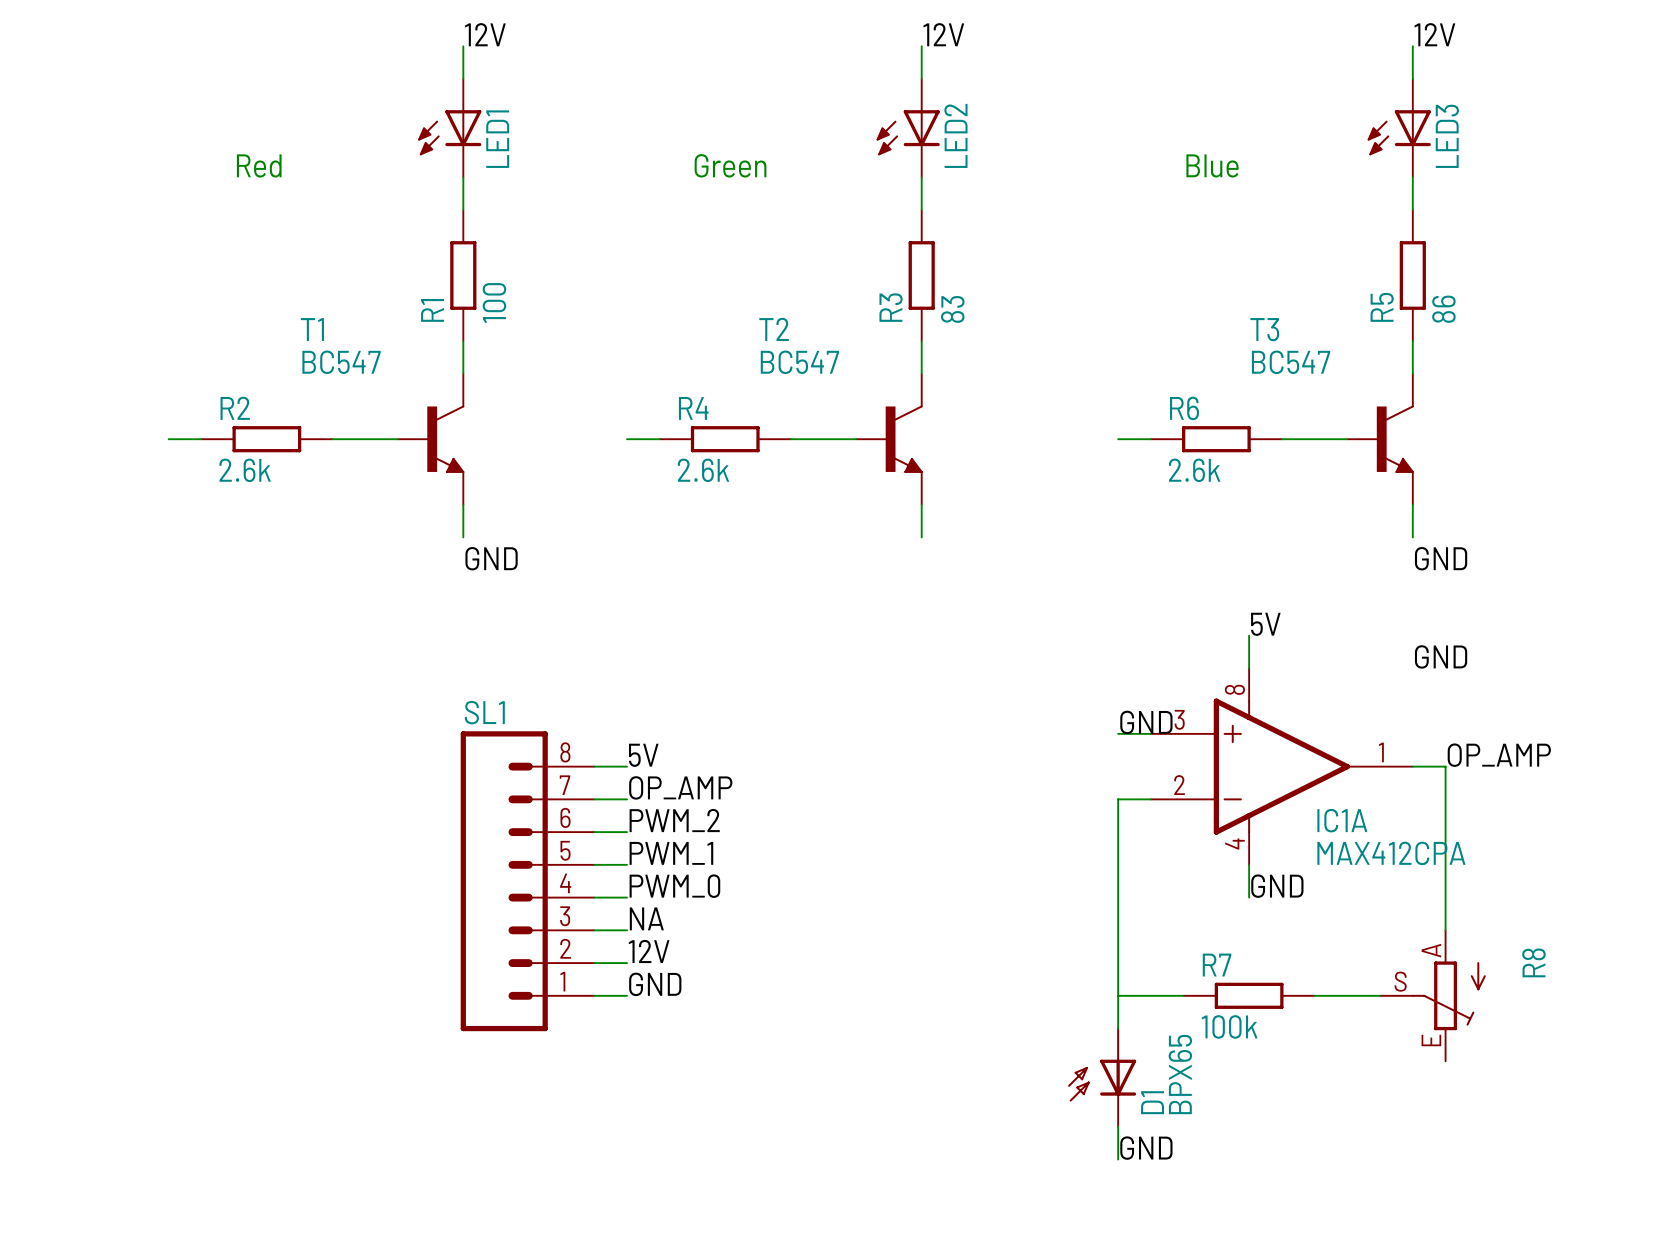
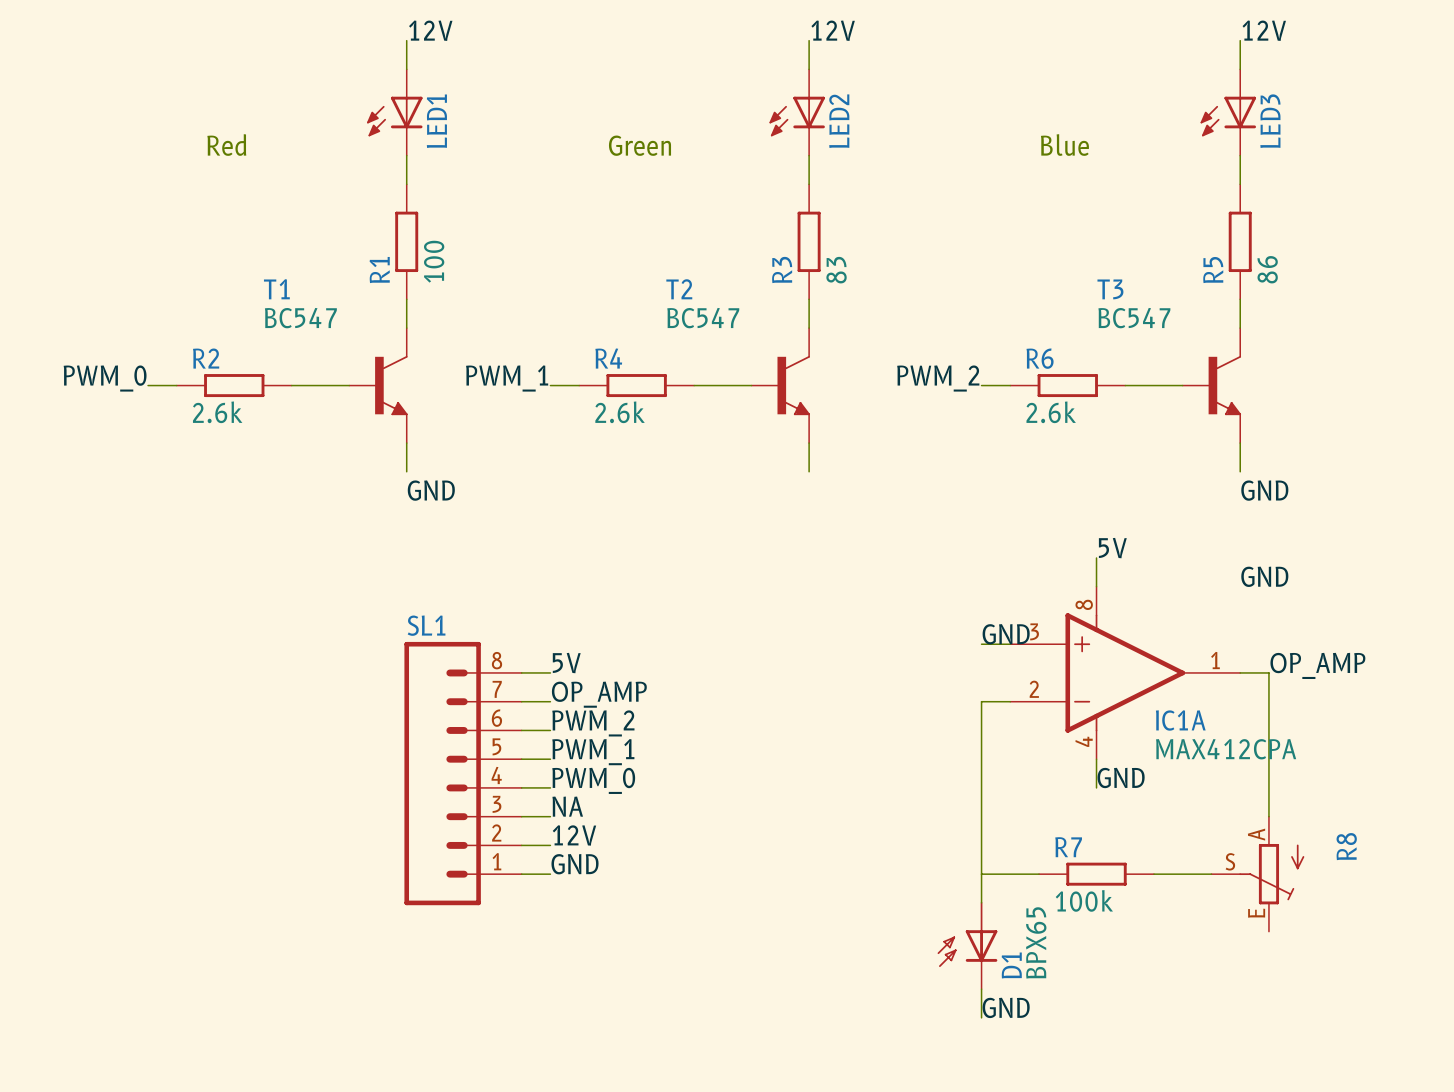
label: none -> PWM_0 (105, 378)
label: none -> PWM_1 (507, 378)
label: none -> PWM_2 (938, 378)

